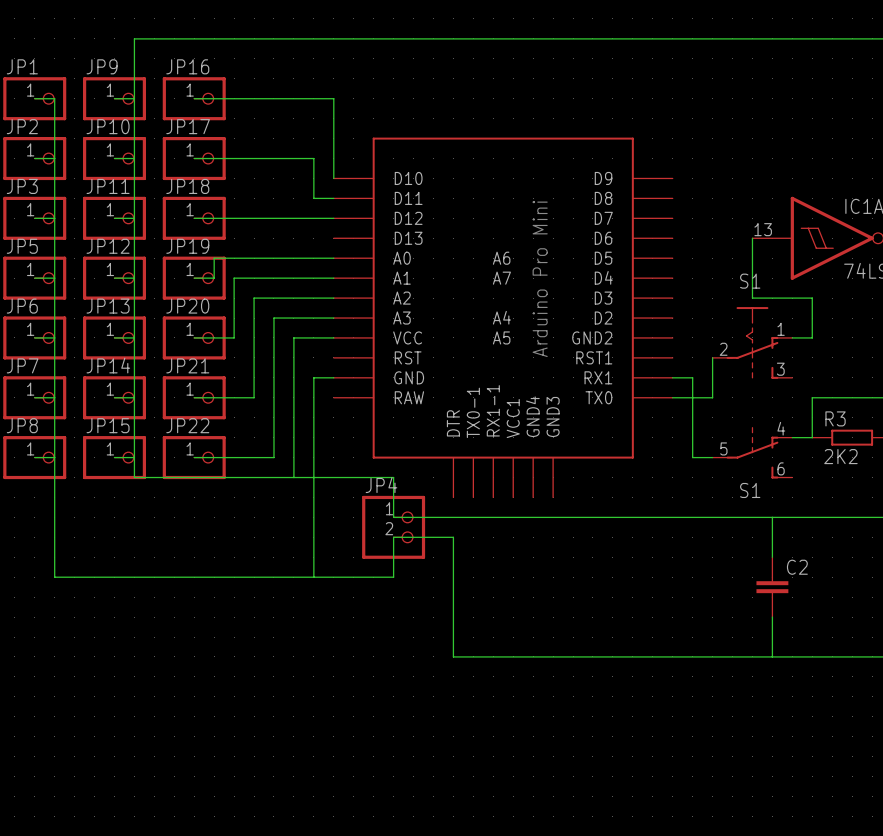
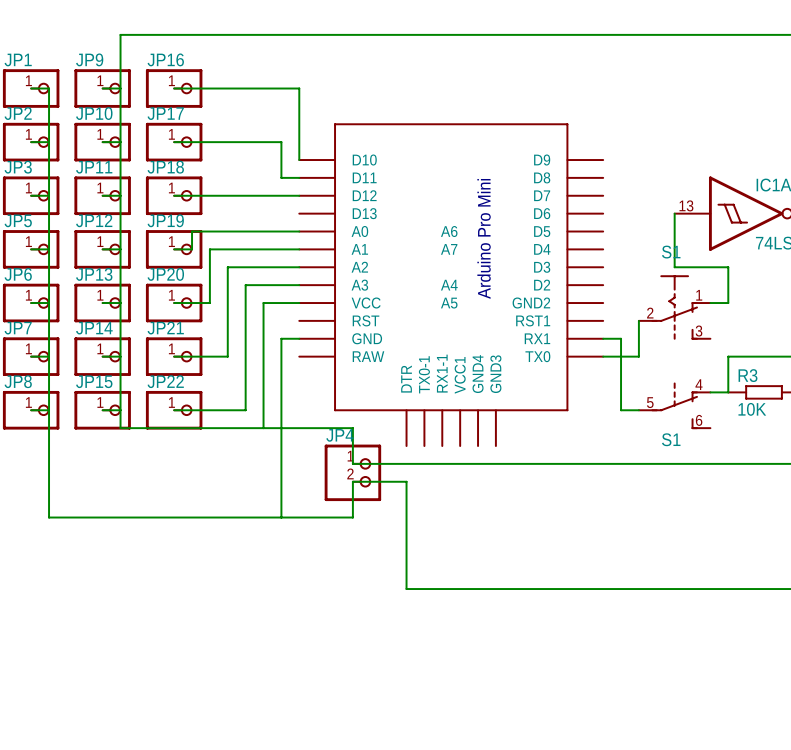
R3 value: 2K2 (840, 456) -> 10K (752, 409)
wire: (772, 517) (772, 557) -> none
C2: (772, 587) -> none
wire: (772, 617) (772, 656) -> none

